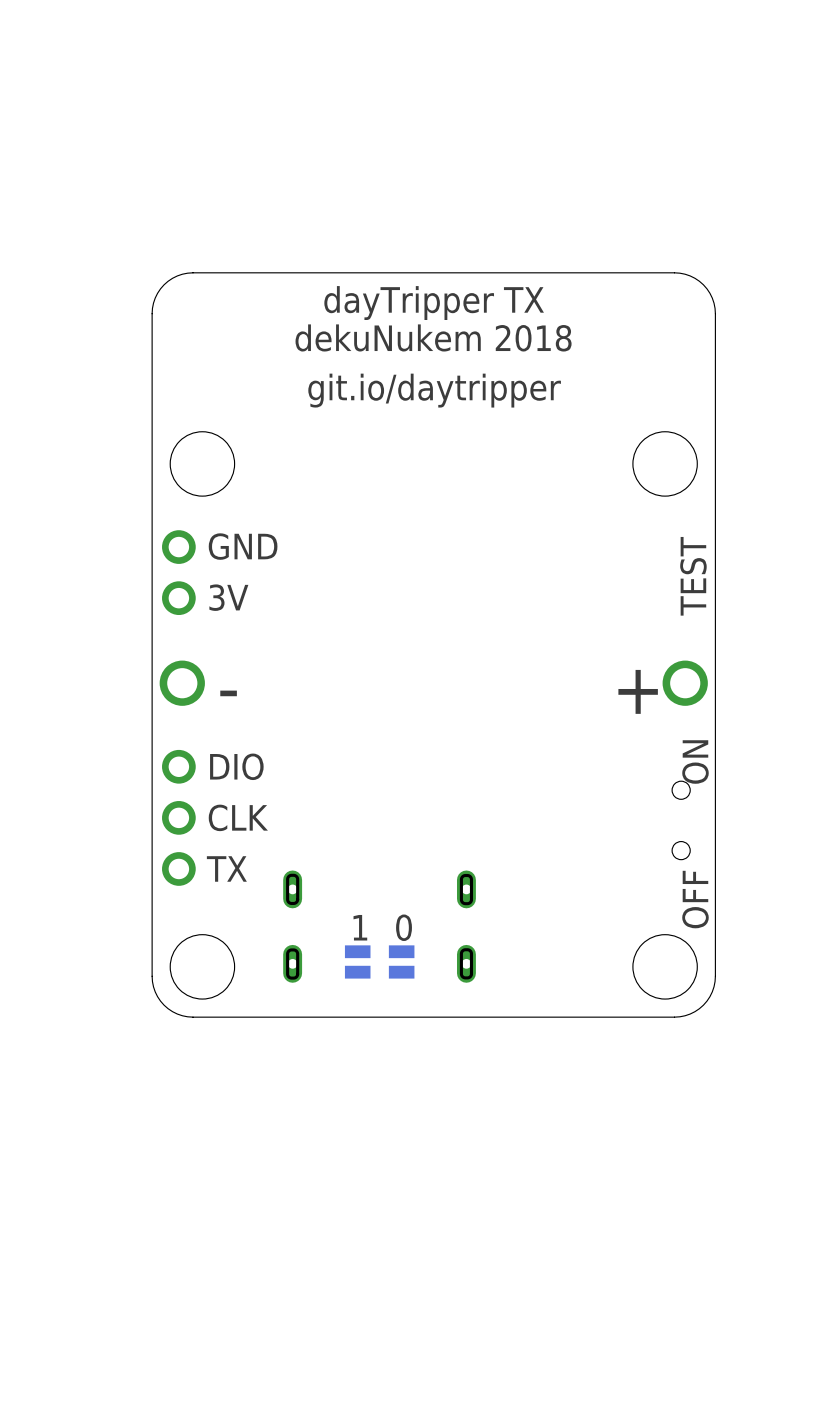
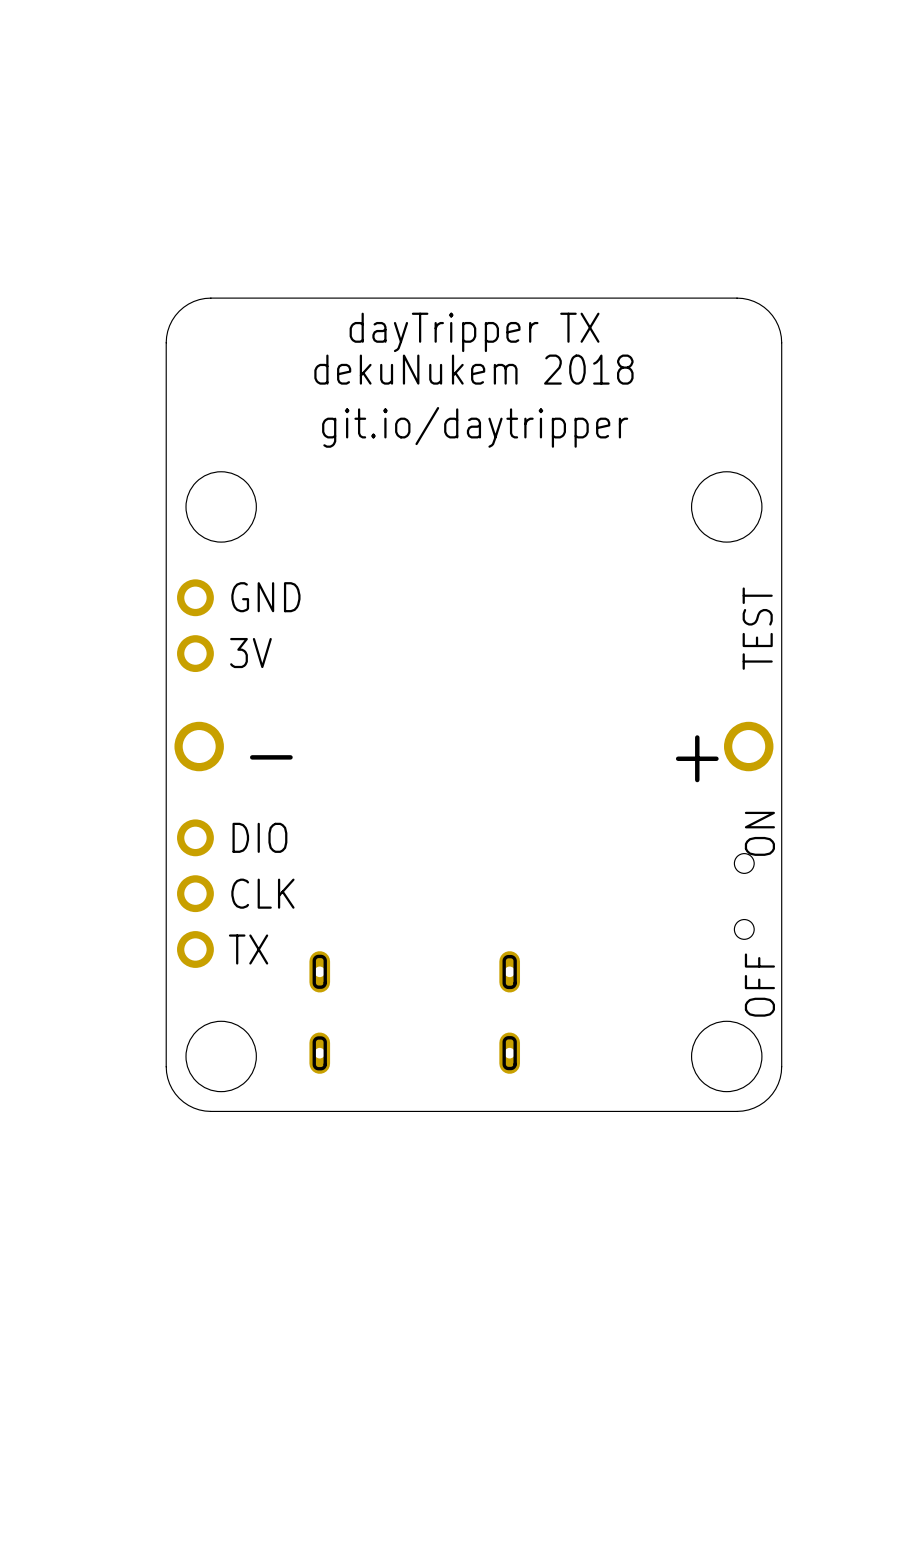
text: 1 (360, 927) -> none
text: 0 (404, 927) -> none
part: (357, 961) -> none
part: (401, 961) -> none

